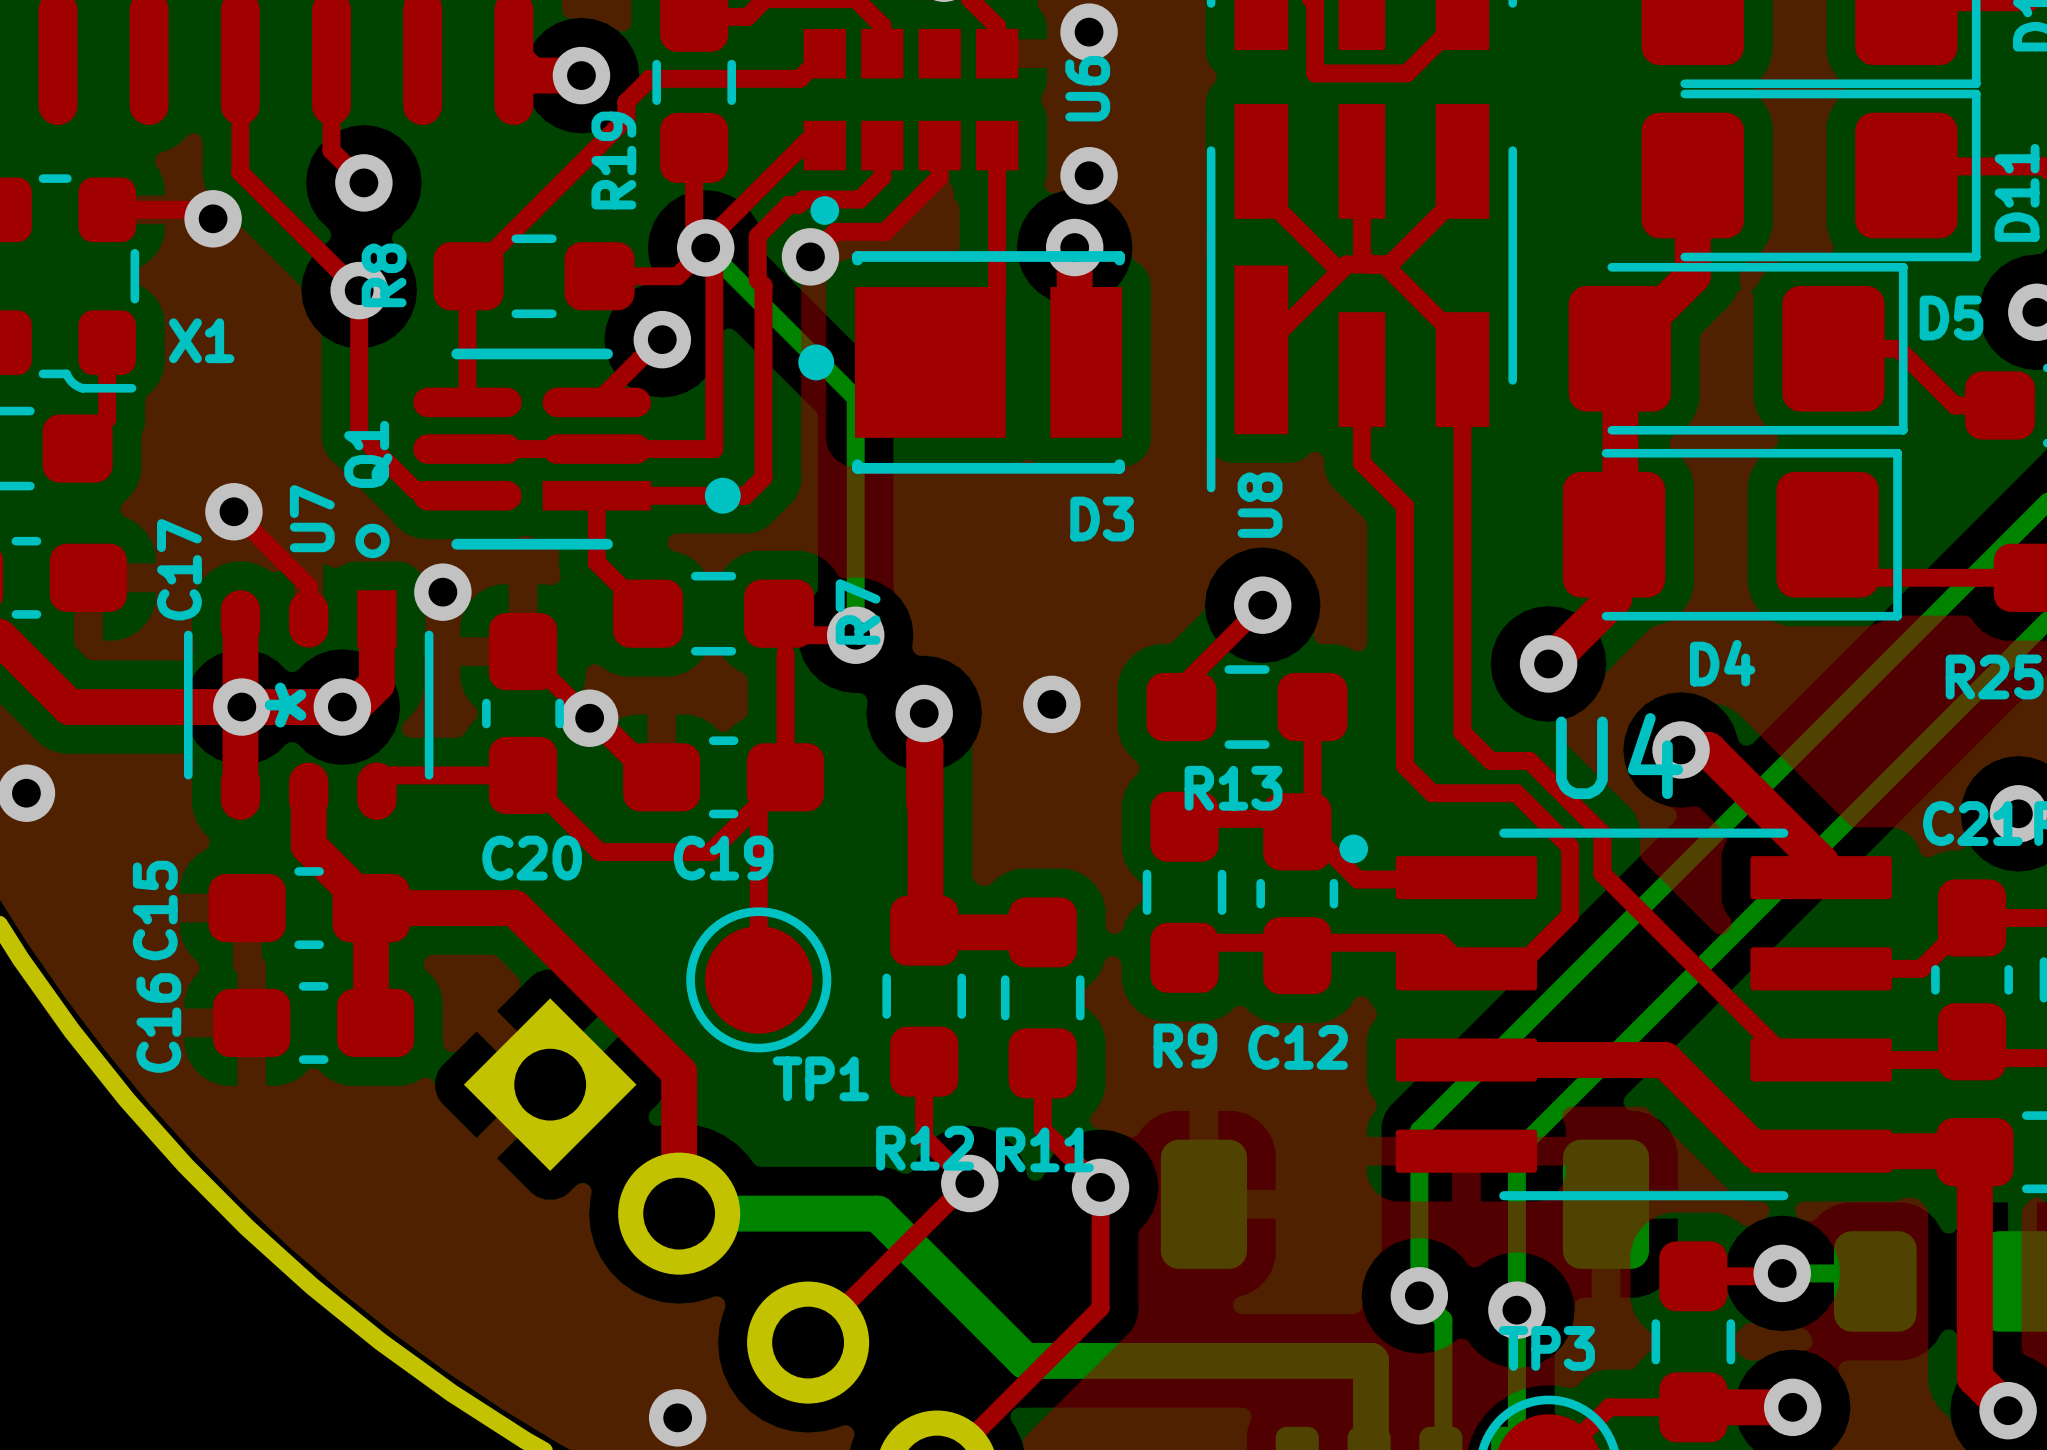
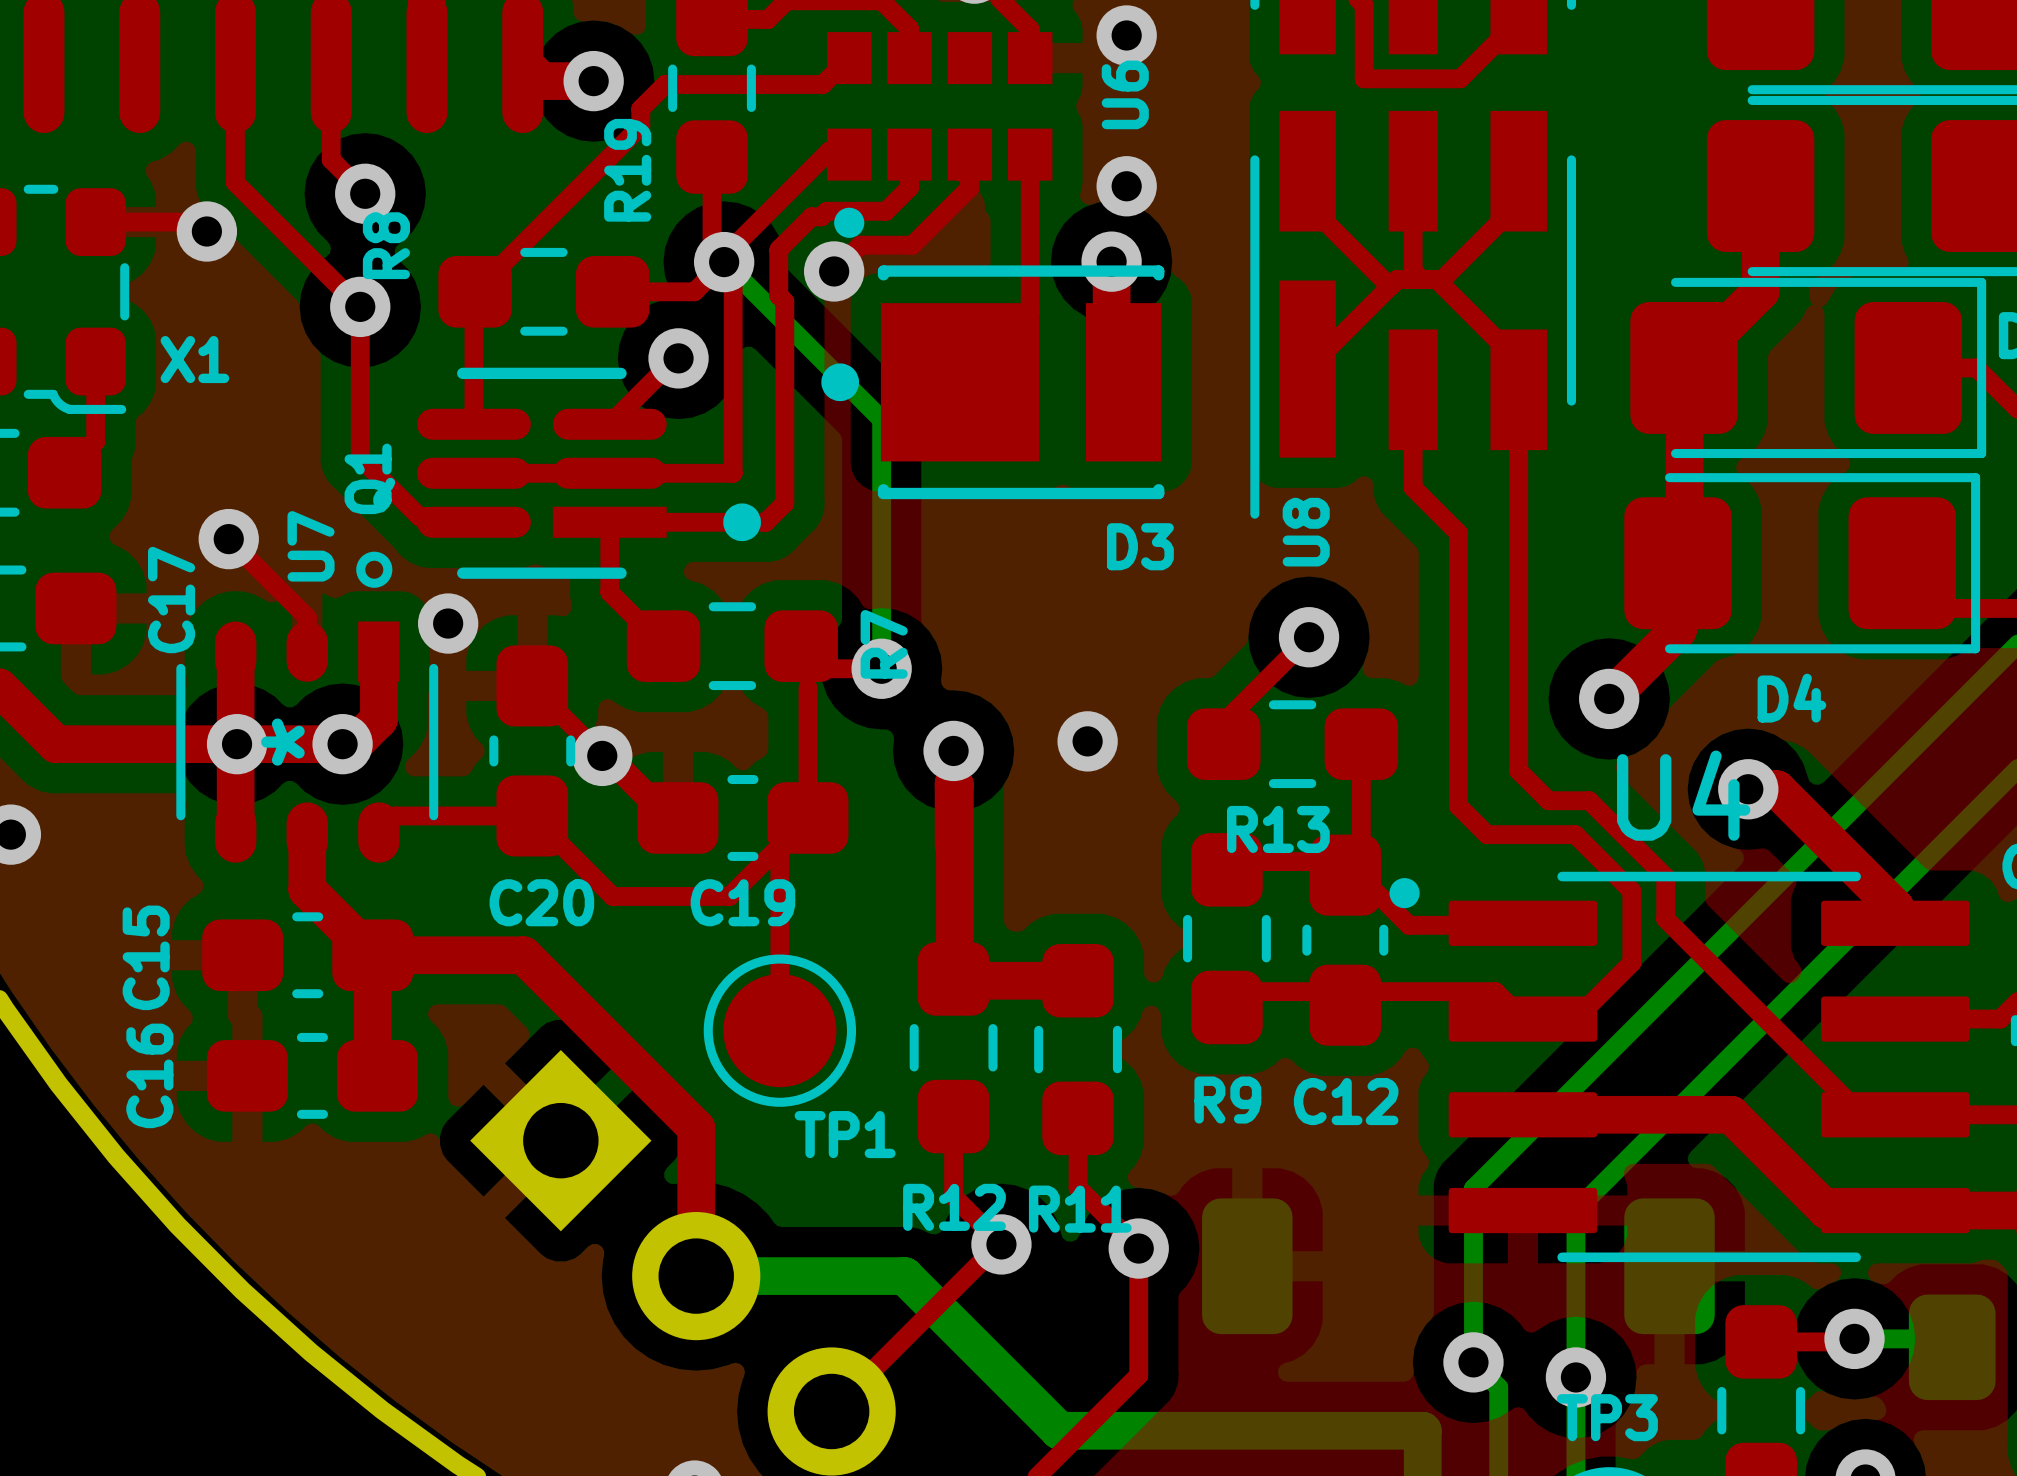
R8 name position: R8 (384, 275) -> R8 (386, 245)

